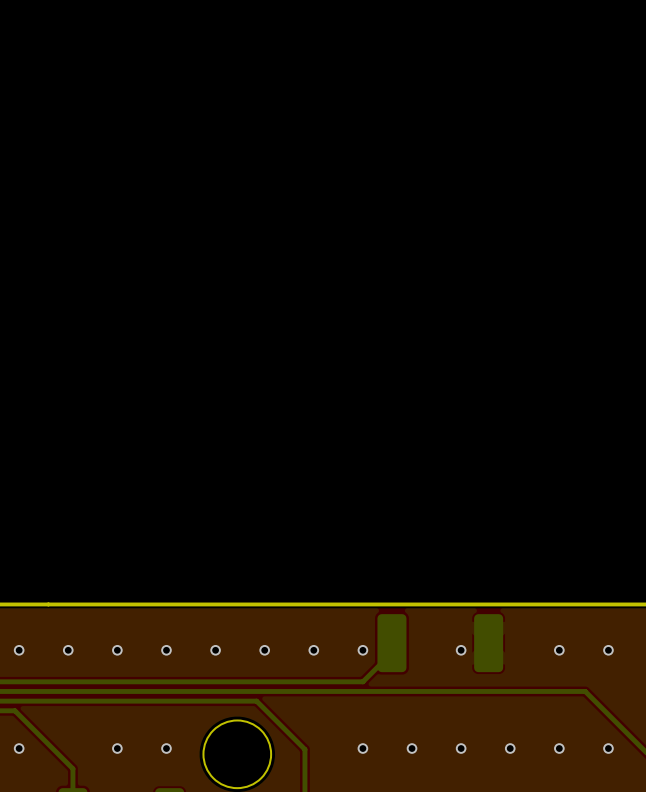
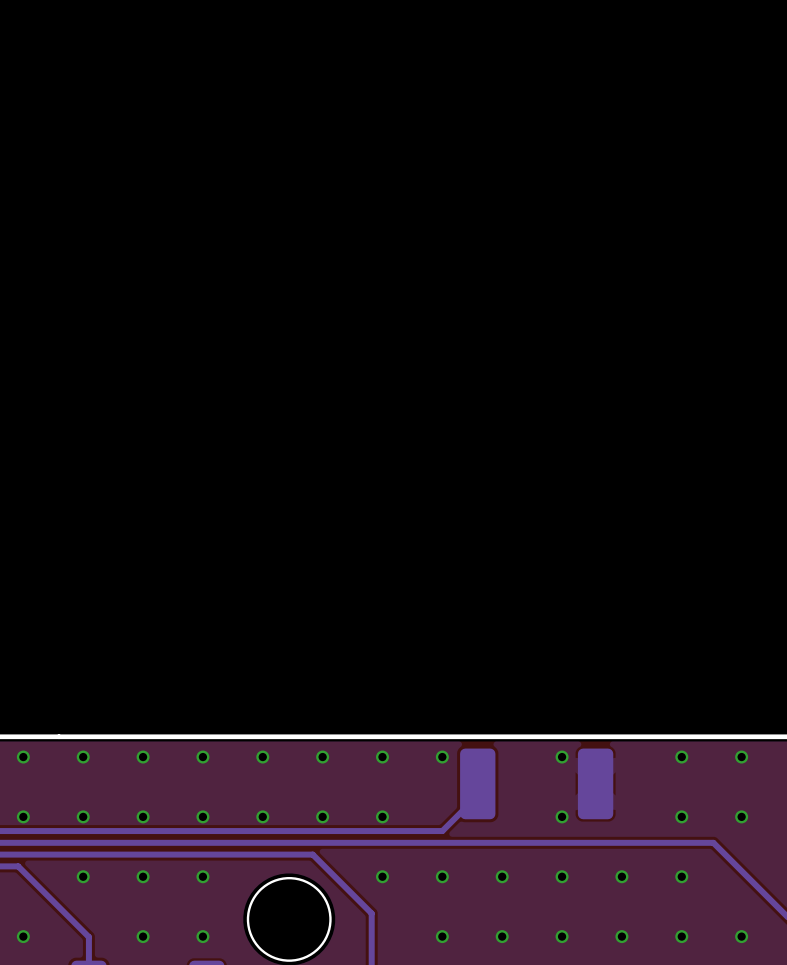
via: none -> (23, 757)
via: none -> (83, 757)
via: none -> (143, 757)
via: none -> (202, 757)
via: none -> (262, 757)
via: none -> (322, 757)
via: none -> (382, 757)
via: none -> (442, 757)
via: none -> (562, 757)
via: none -> (681, 757)
via: none -> (741, 757)
via: (19, 650) -> none
via: (68, 650) -> none
via: (117, 650) -> none
via: (166, 650) -> none
via: (215, 650) -> none
via: (264, 650) -> none
via: (313, 650) -> none
via: (362, 650) -> none
via: (461, 650) -> none
via: (559, 650) -> none
via: (608, 650) -> none
via: none -> (23, 816)
via: none -> (83, 816)
via: none -> (143, 816)
via: none -> (202, 816)
via: none -> (262, 816)
via: none -> (322, 816)
via: none -> (382, 816)
via: none -> (562, 816)
via: none -> (681, 816)
via: none -> (741, 816)
via: none -> (83, 876)
via: none -> (143, 876)
via: none -> (202, 876)
via: none -> (382, 876)
via: none -> (442, 876)
via: none -> (502, 876)
via: none -> (562, 876)
via: none -> (621, 876)
via: none -> (681, 876)
via: (19, 748) -> none
via: (117, 748) -> none
via: (166, 748) -> none
via: (362, 748) -> none
via: (412, 748) -> none
via: (461, 748) -> none
via: (510, 748) -> none
via: (559, 748) -> none
via: (608, 748) -> none
via: none -> (23, 936)
via: none -> (143, 936)
via: none -> (202, 936)
via: none -> (442, 936)
via: none -> (502, 936)
via: none -> (562, 936)
via: none -> (621, 936)
via: none -> (681, 936)
via: none -> (741, 936)

